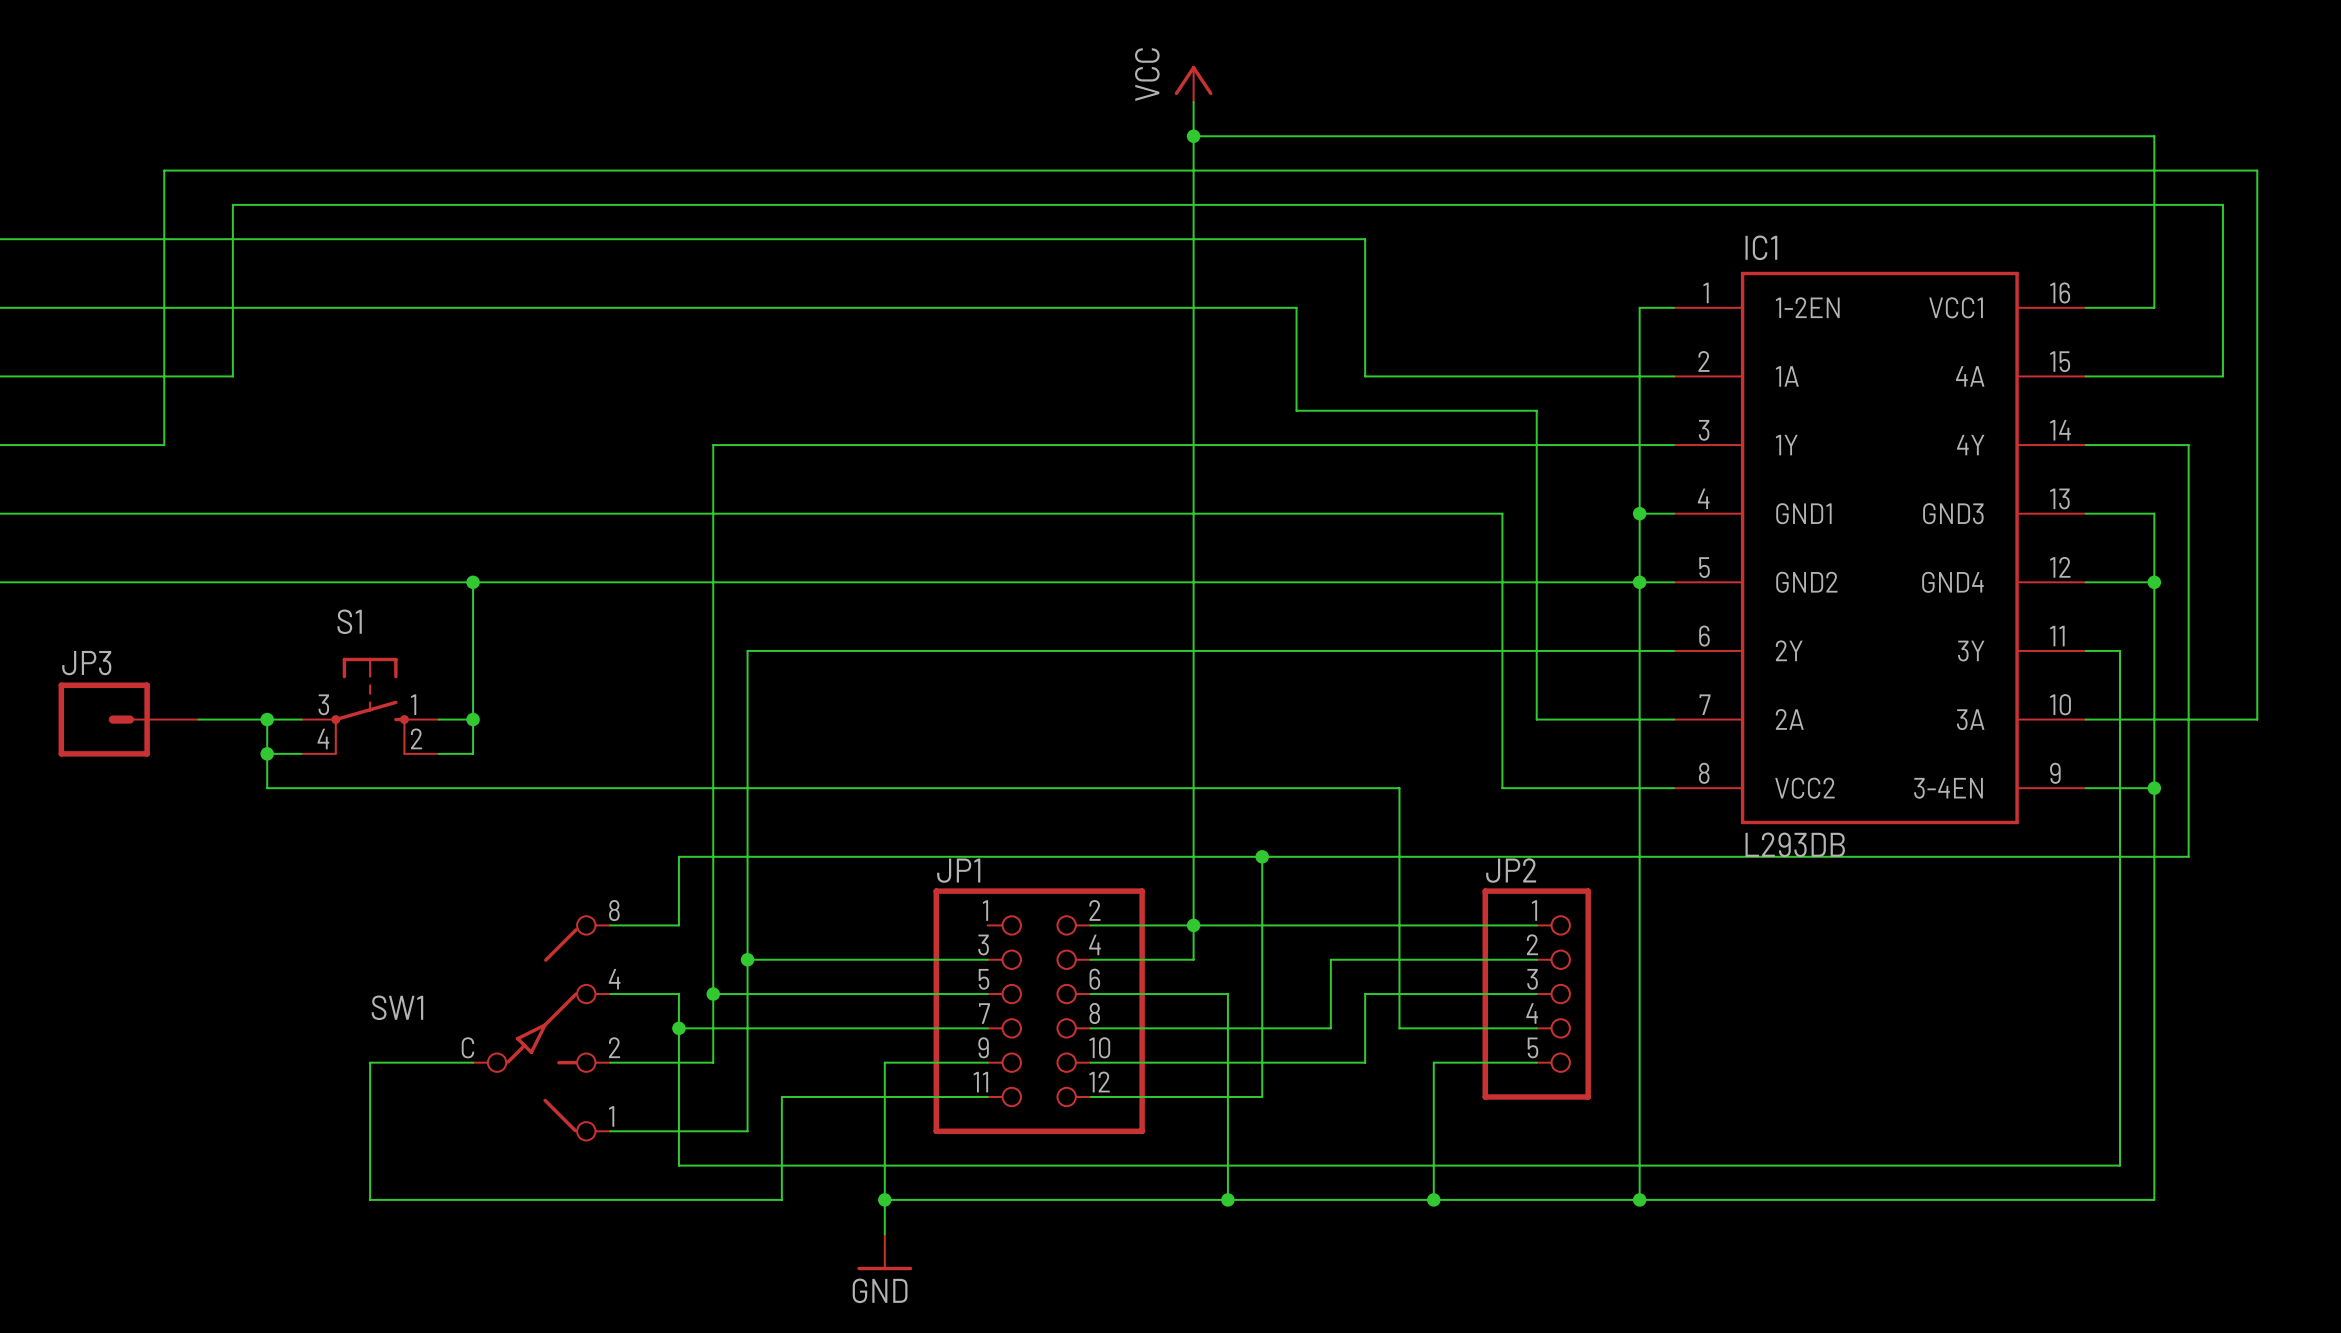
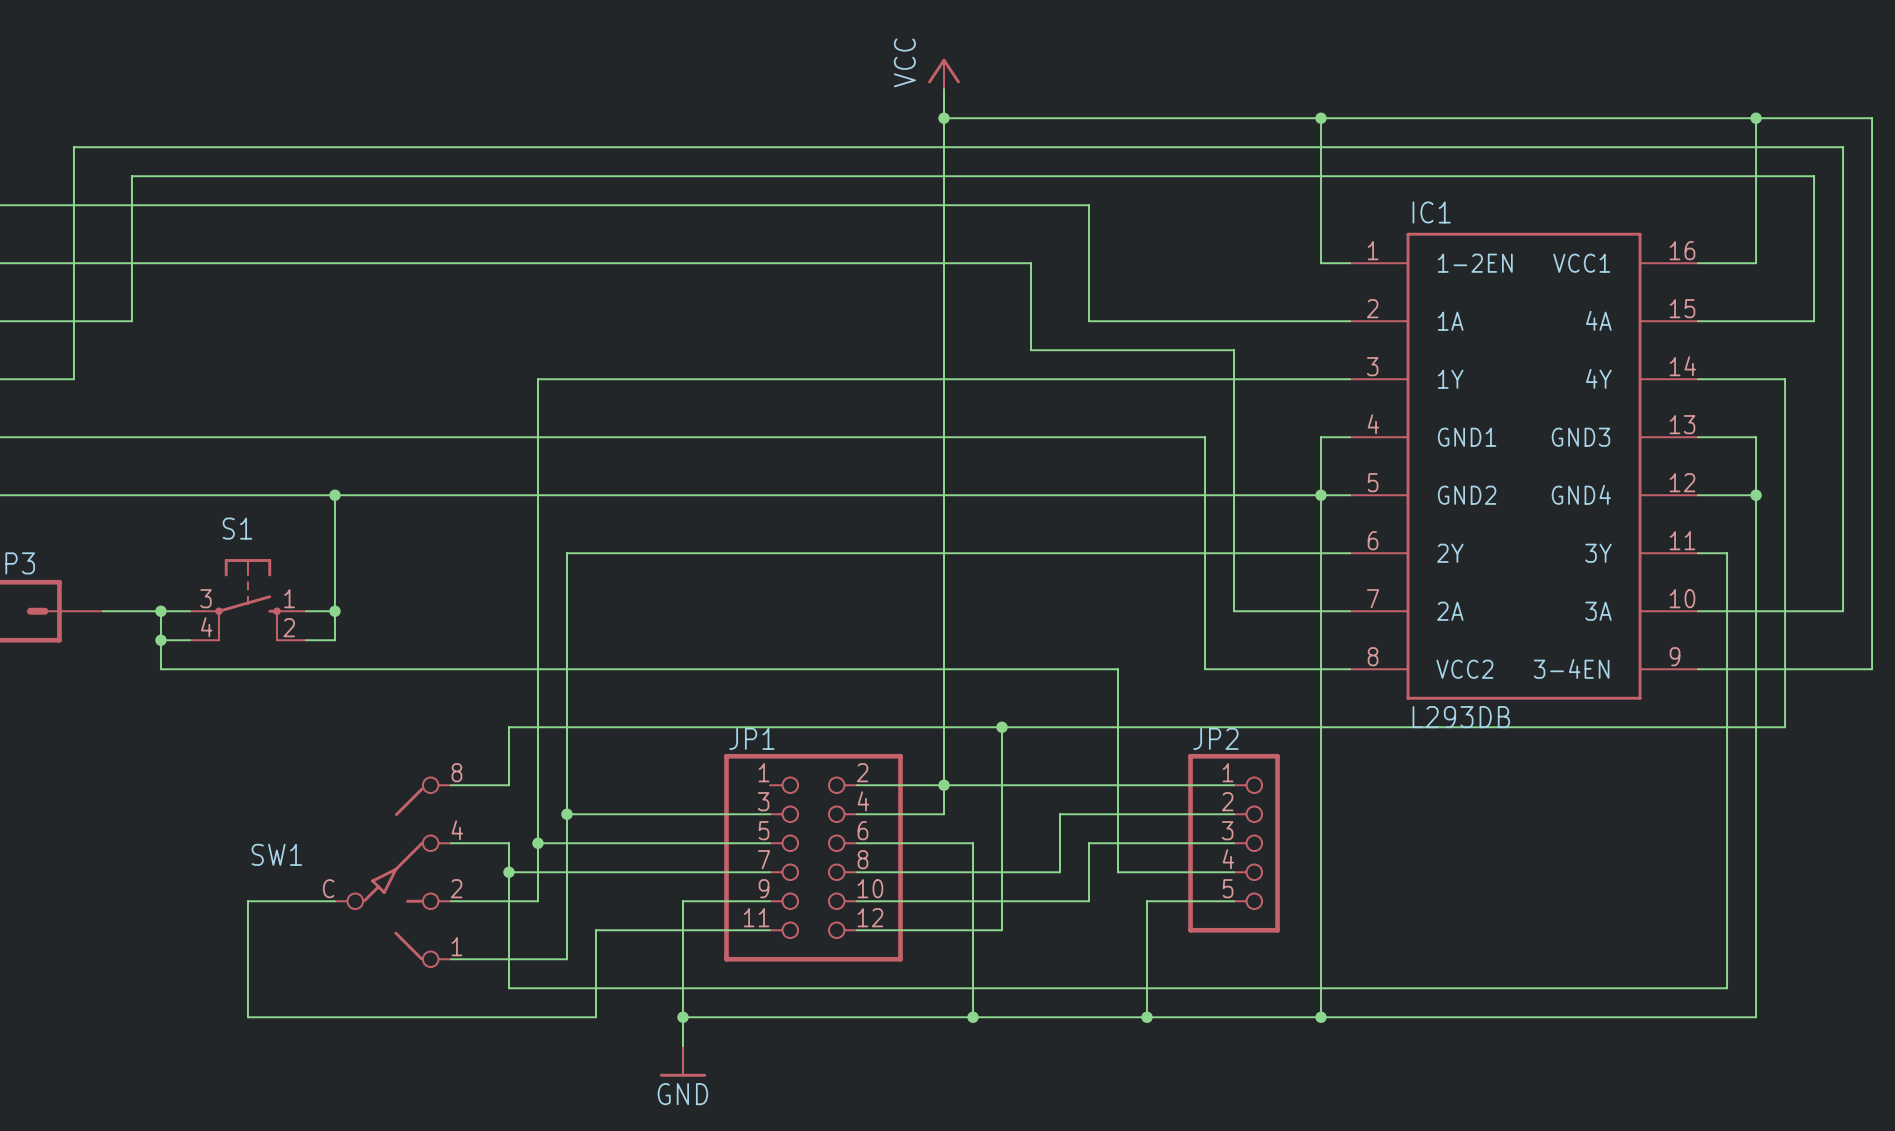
junction: none -> (1321, 118)
wire: none -> (1756, 118) (1872, 118) (1872, 669) (1756, 669)
junction: none -> (1756, 118)
wire: (1639, 307) (1639, 513) -> (1321, 263) (1321, 118)
junction: (1639, 513) -> none
junction: (2154, 788) -> none

